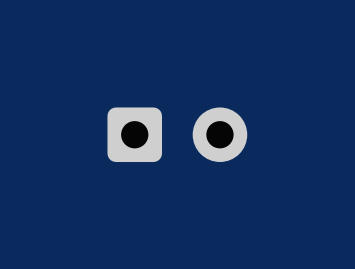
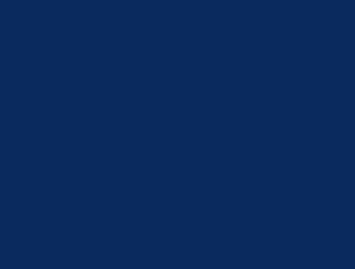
part: (177, 134) -> none

